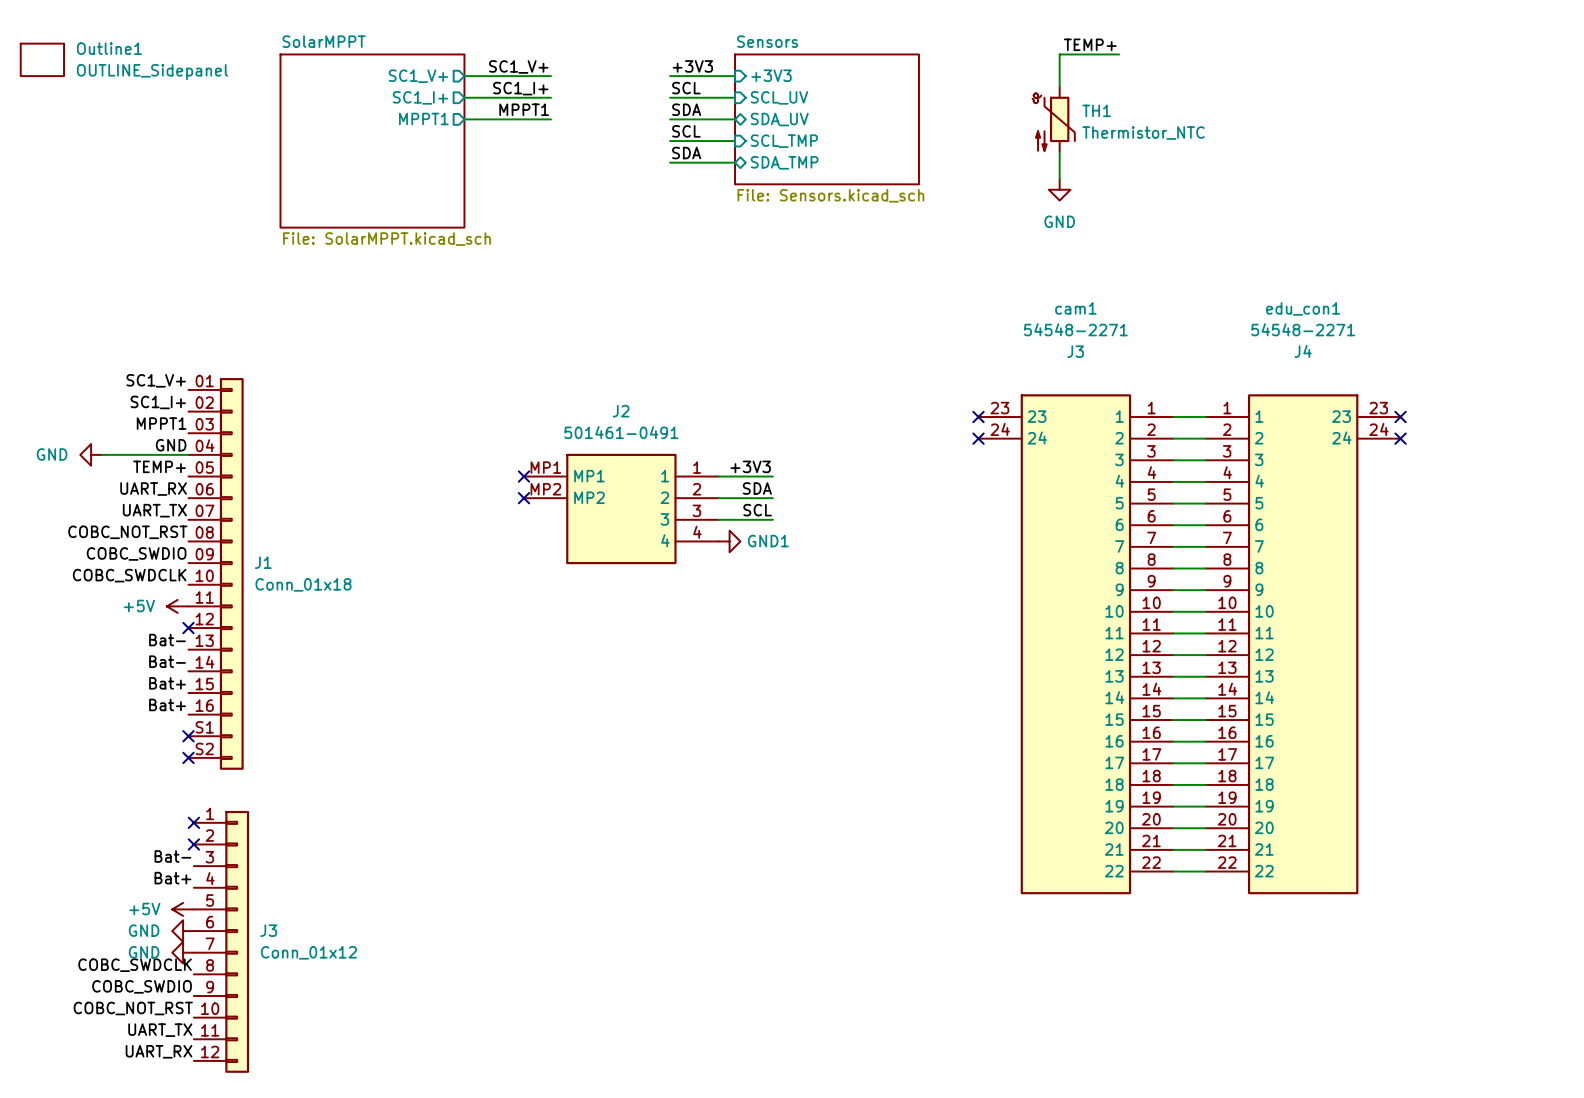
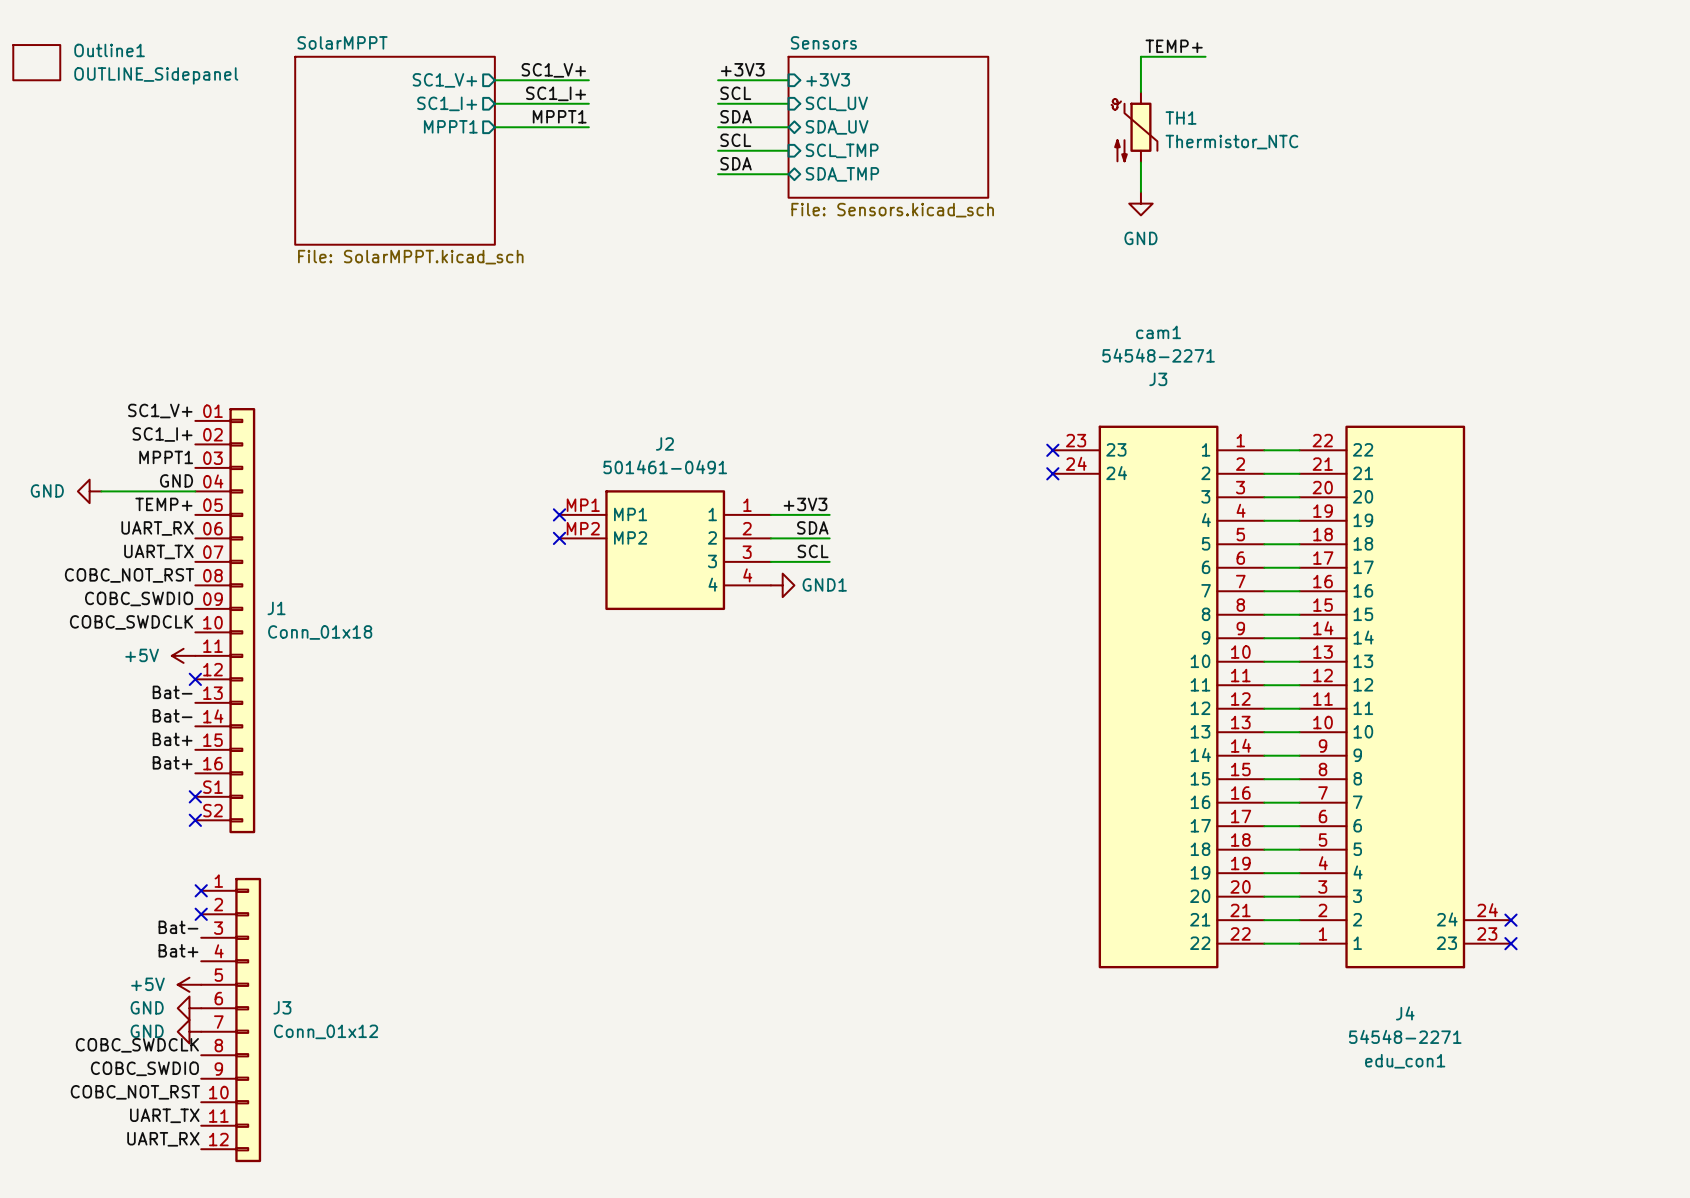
no-connect mark: (1400, 417) -> none
no-connect mark: (1400, 438) -> none
edu_con1 flip: as is (1303, 644) -> up-down (1405, 696)
no-connect mark: none -> (1510, 920)
no-connect mark: none -> (1510, 943)

